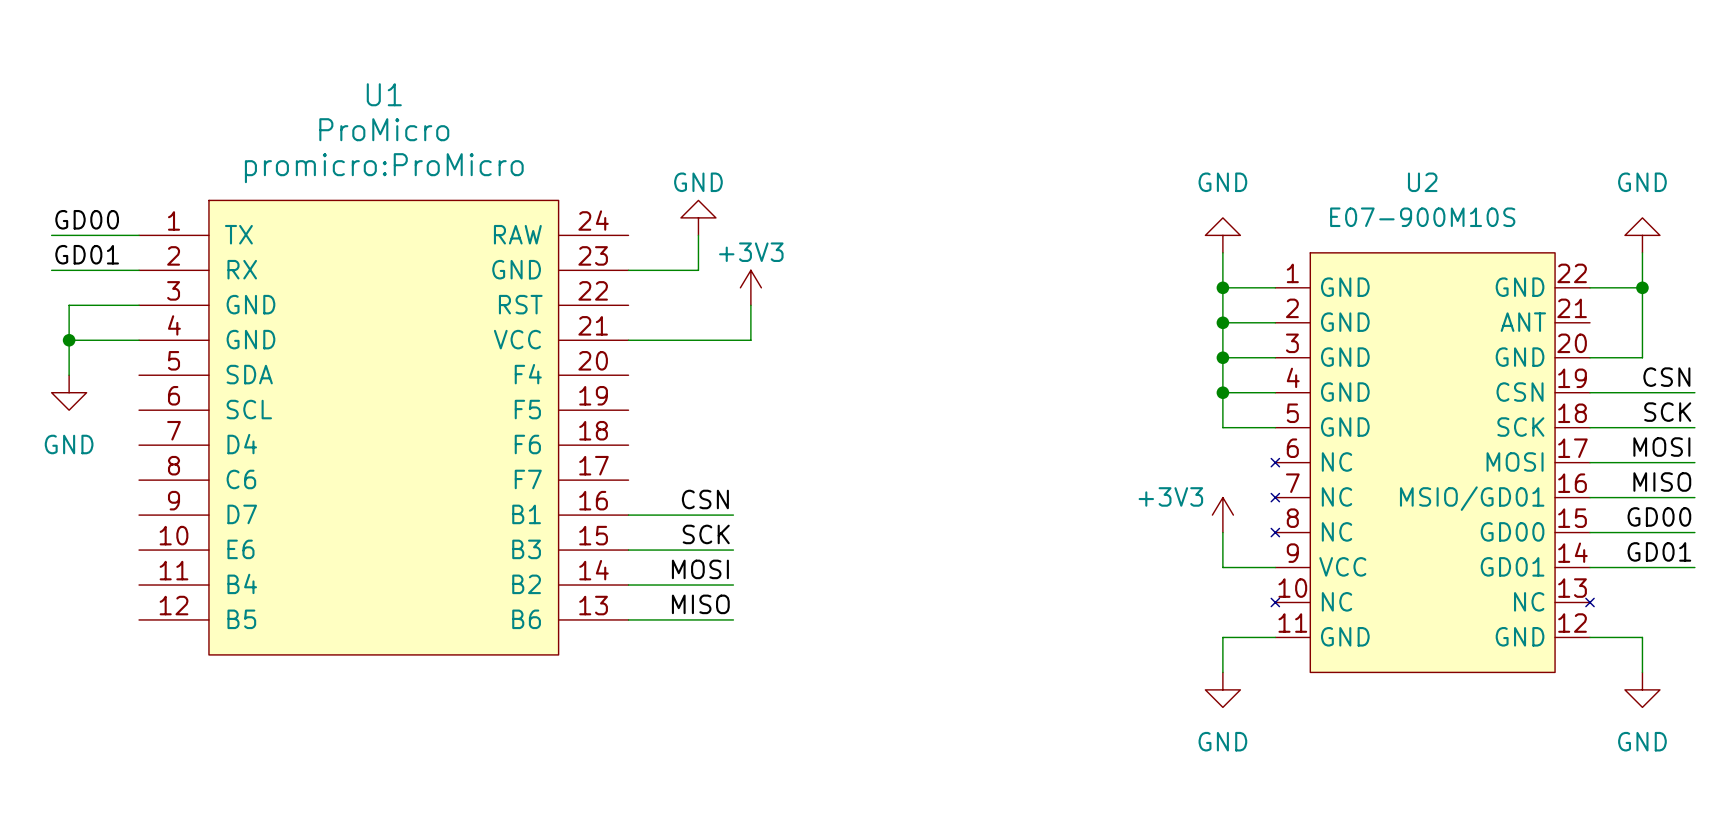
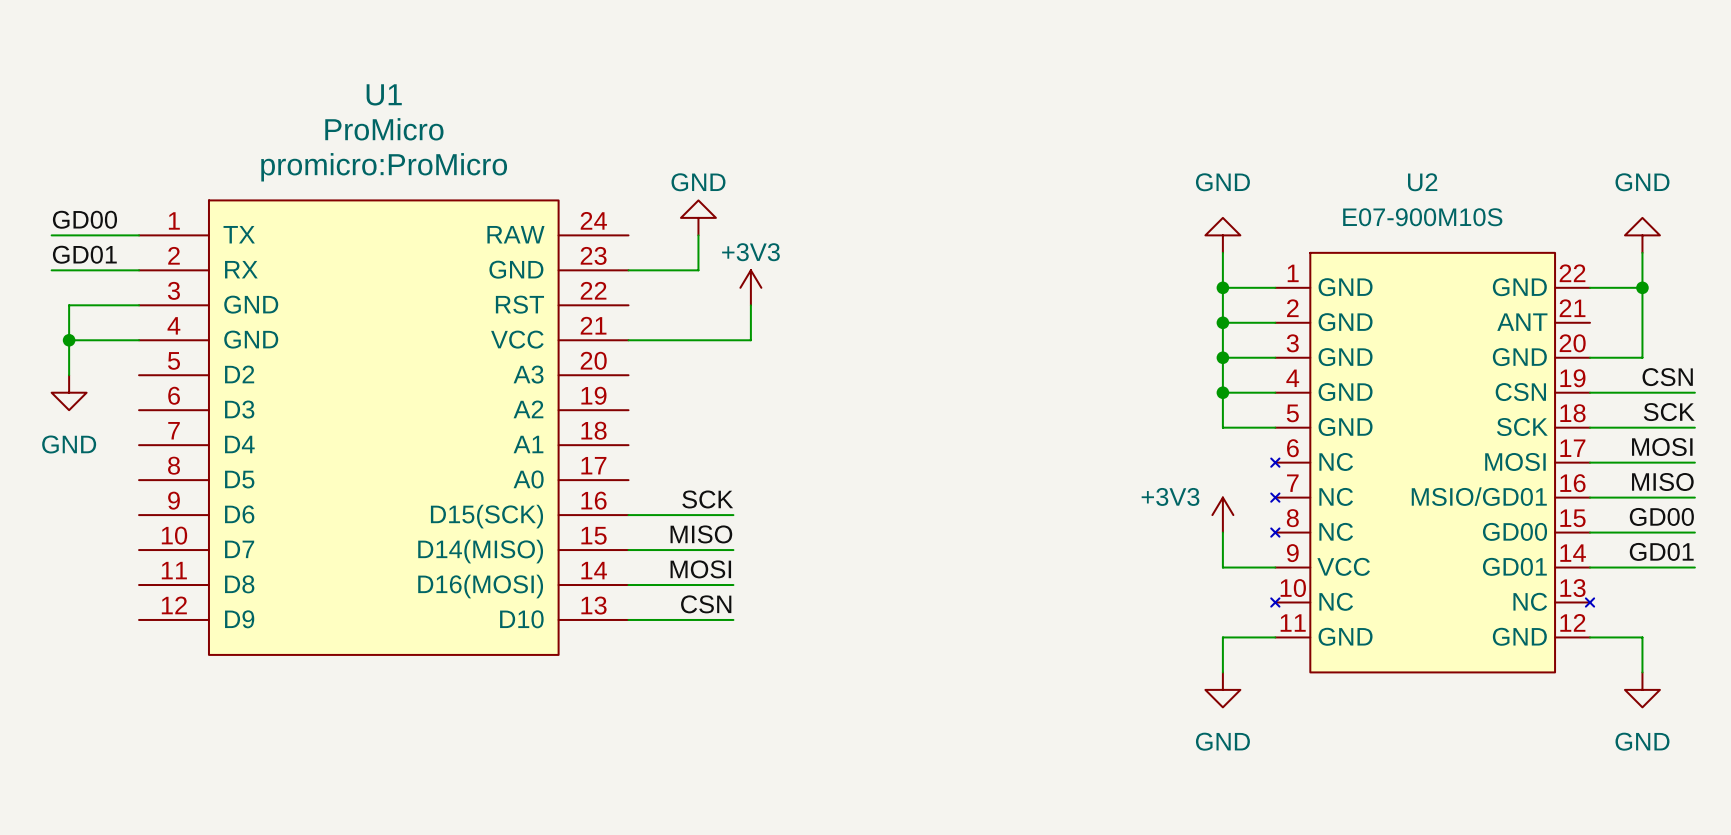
U1 symbol: [139, 200, 629, 655] -> [139, 200, 629, 655]
label: CSN (705, 499) -> SCK (707, 499)
label: SCK (706, 534) -> MISO (701, 534)
label: MISO (700, 604) -> CSN (706, 604)

